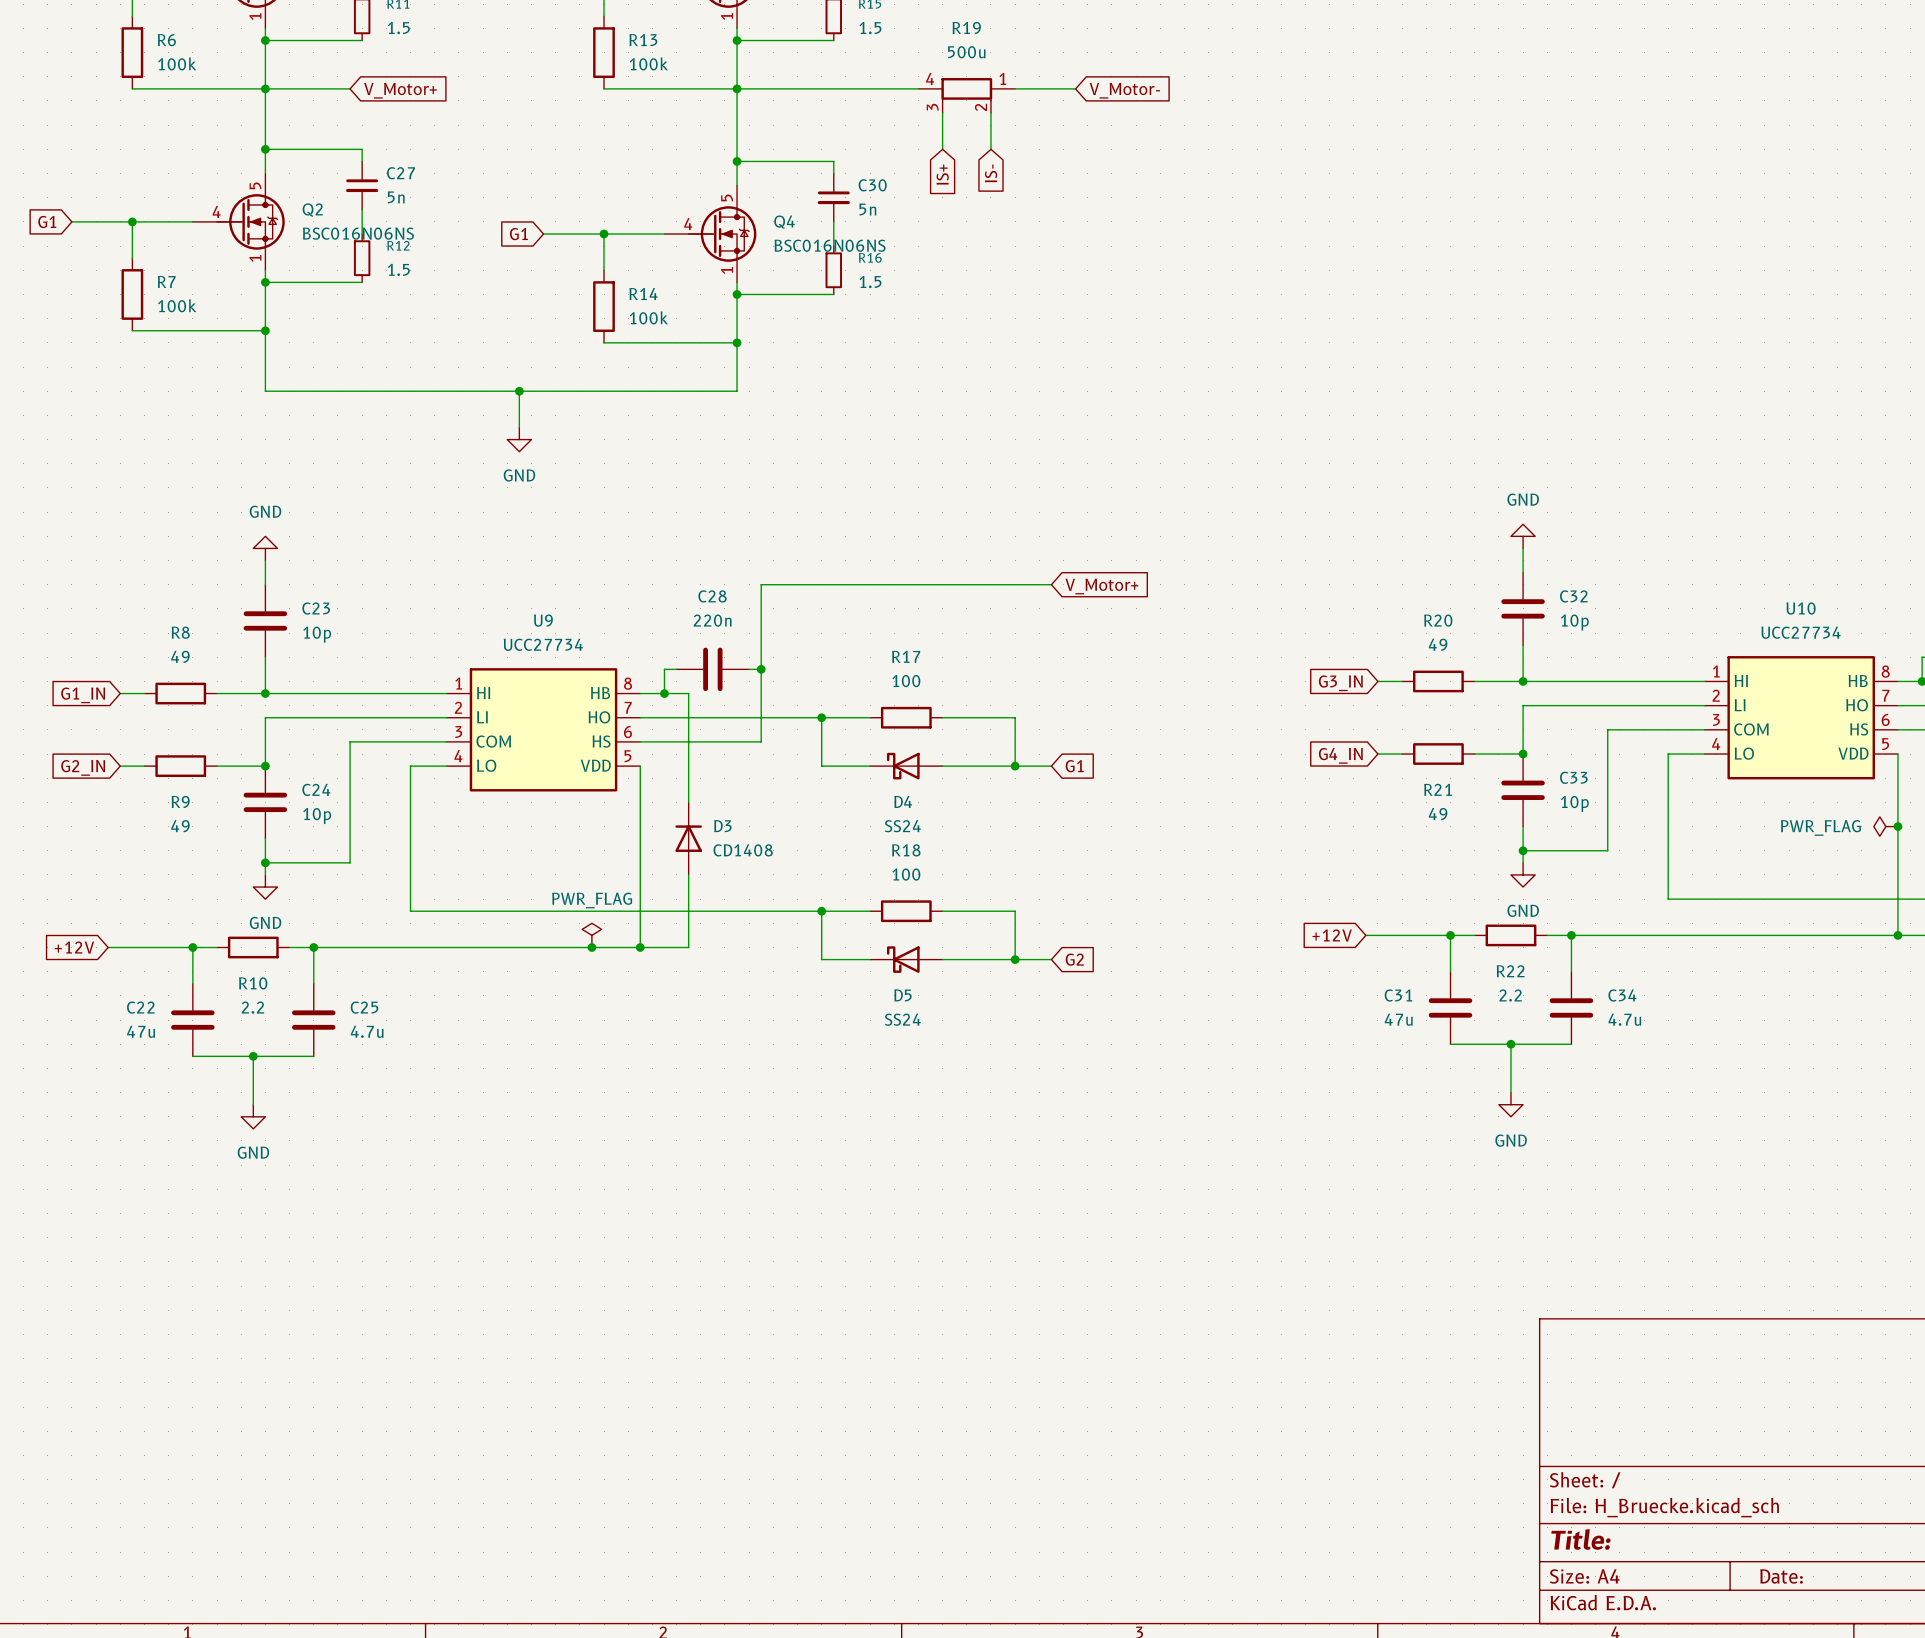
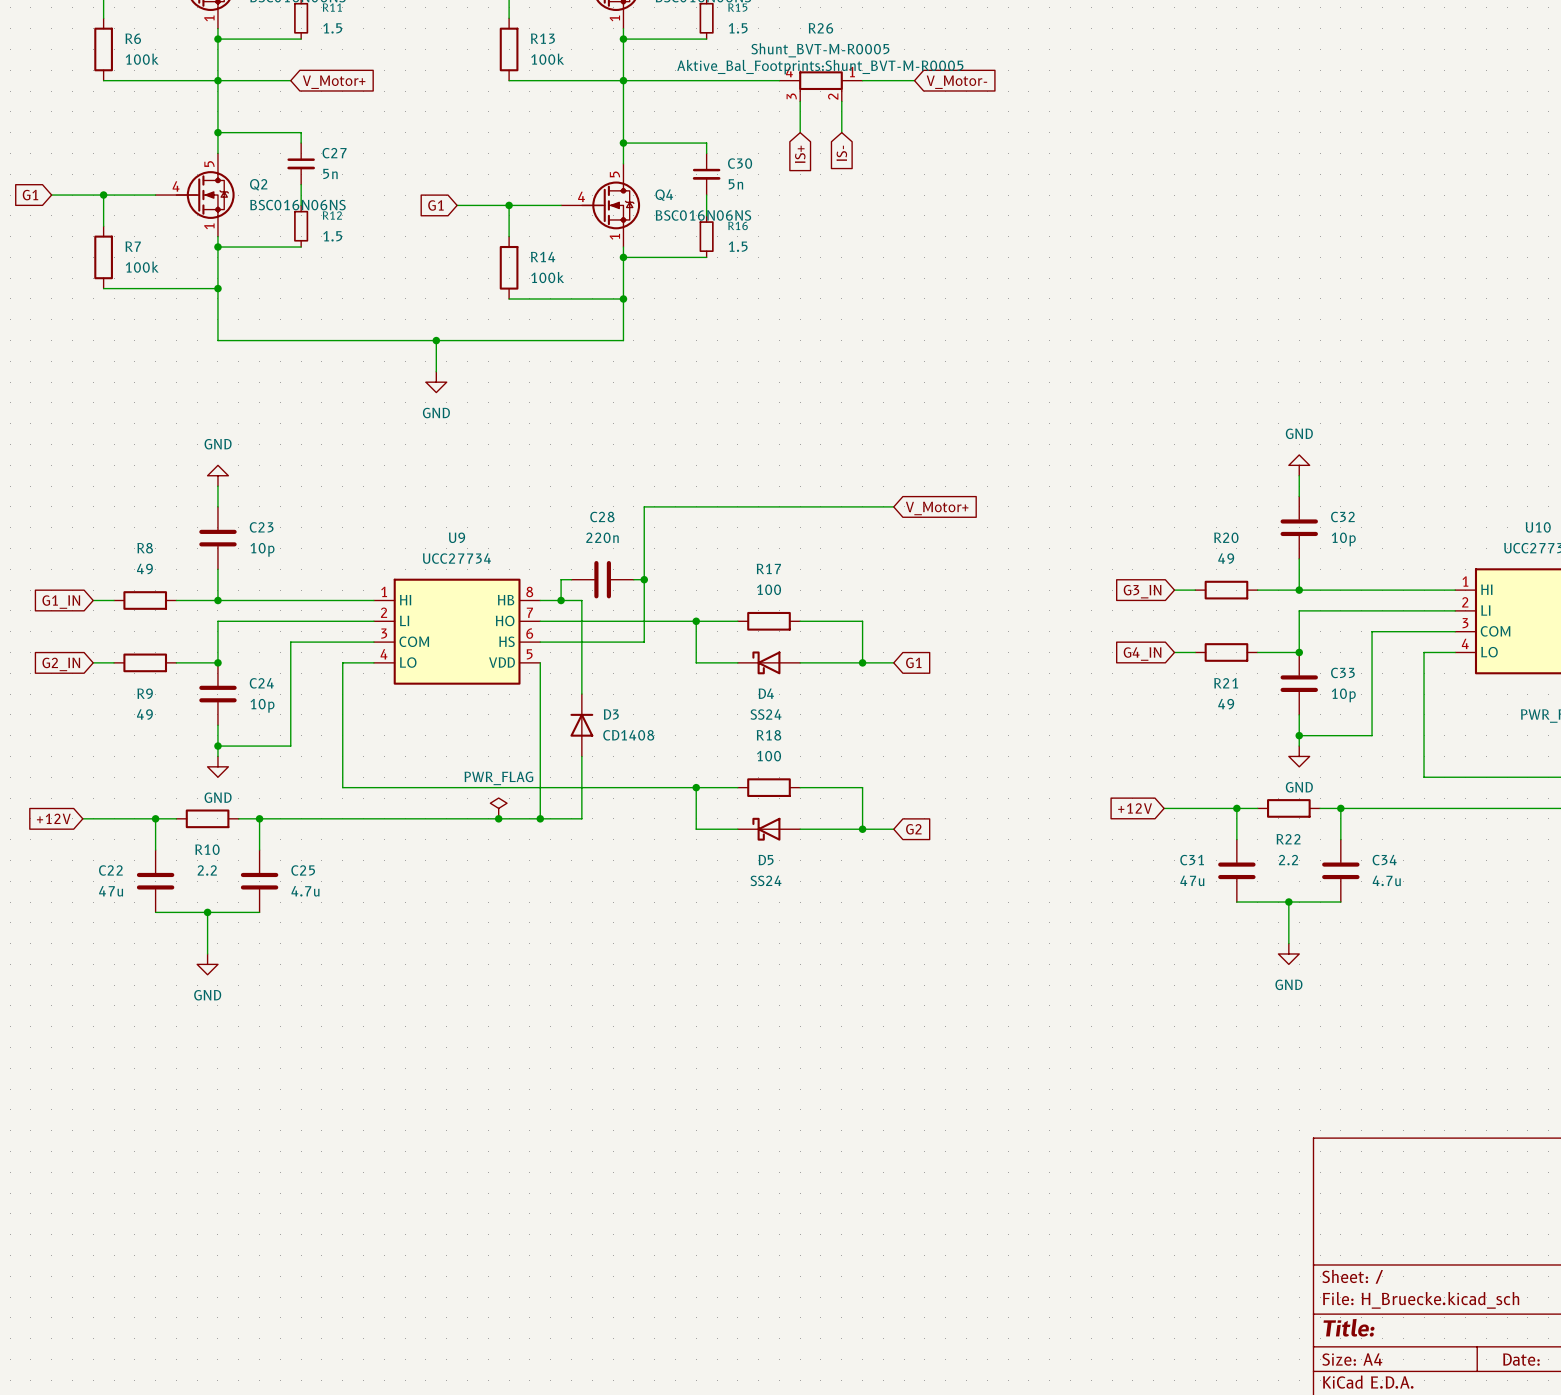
R19 name: R19 (966, 28) -> R26 (820, 28)
R19 value: 500u (966, 52) -> Shunt_BVT-M-R0005 (820, 50)
R19 text: none -> Aktive_Bal_Footprints:Shunt_BVT-M-R0005 (820, 67)

